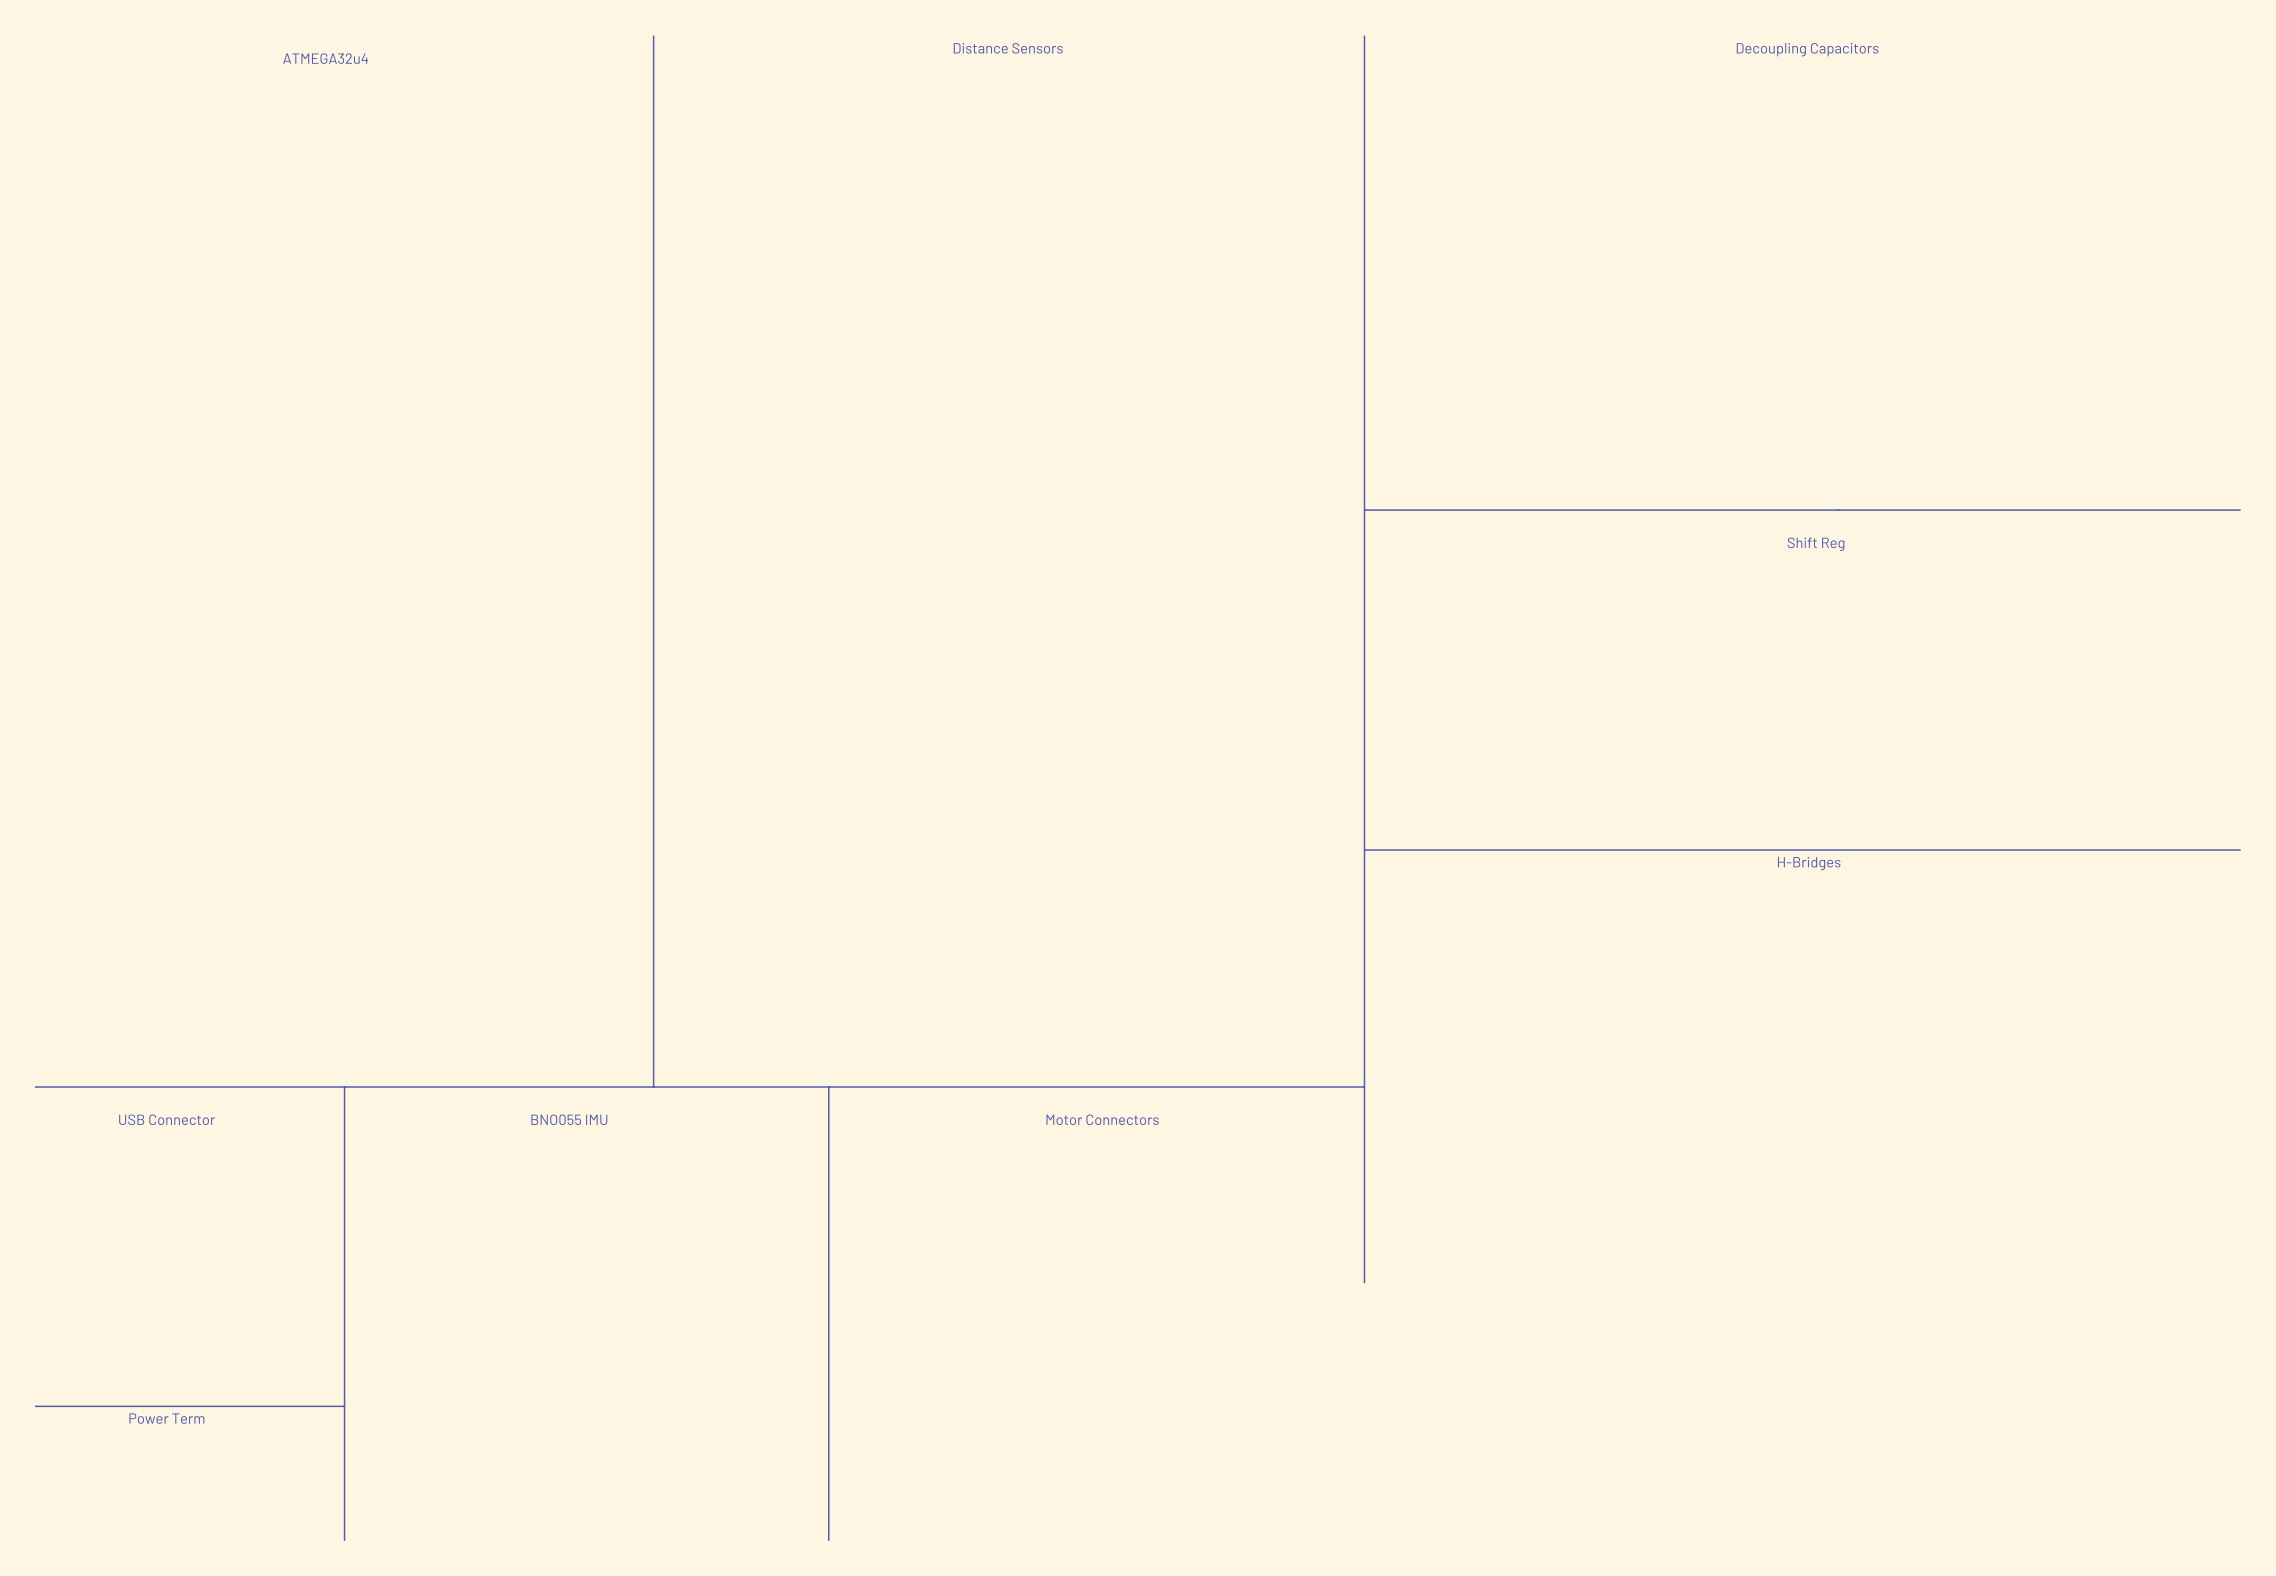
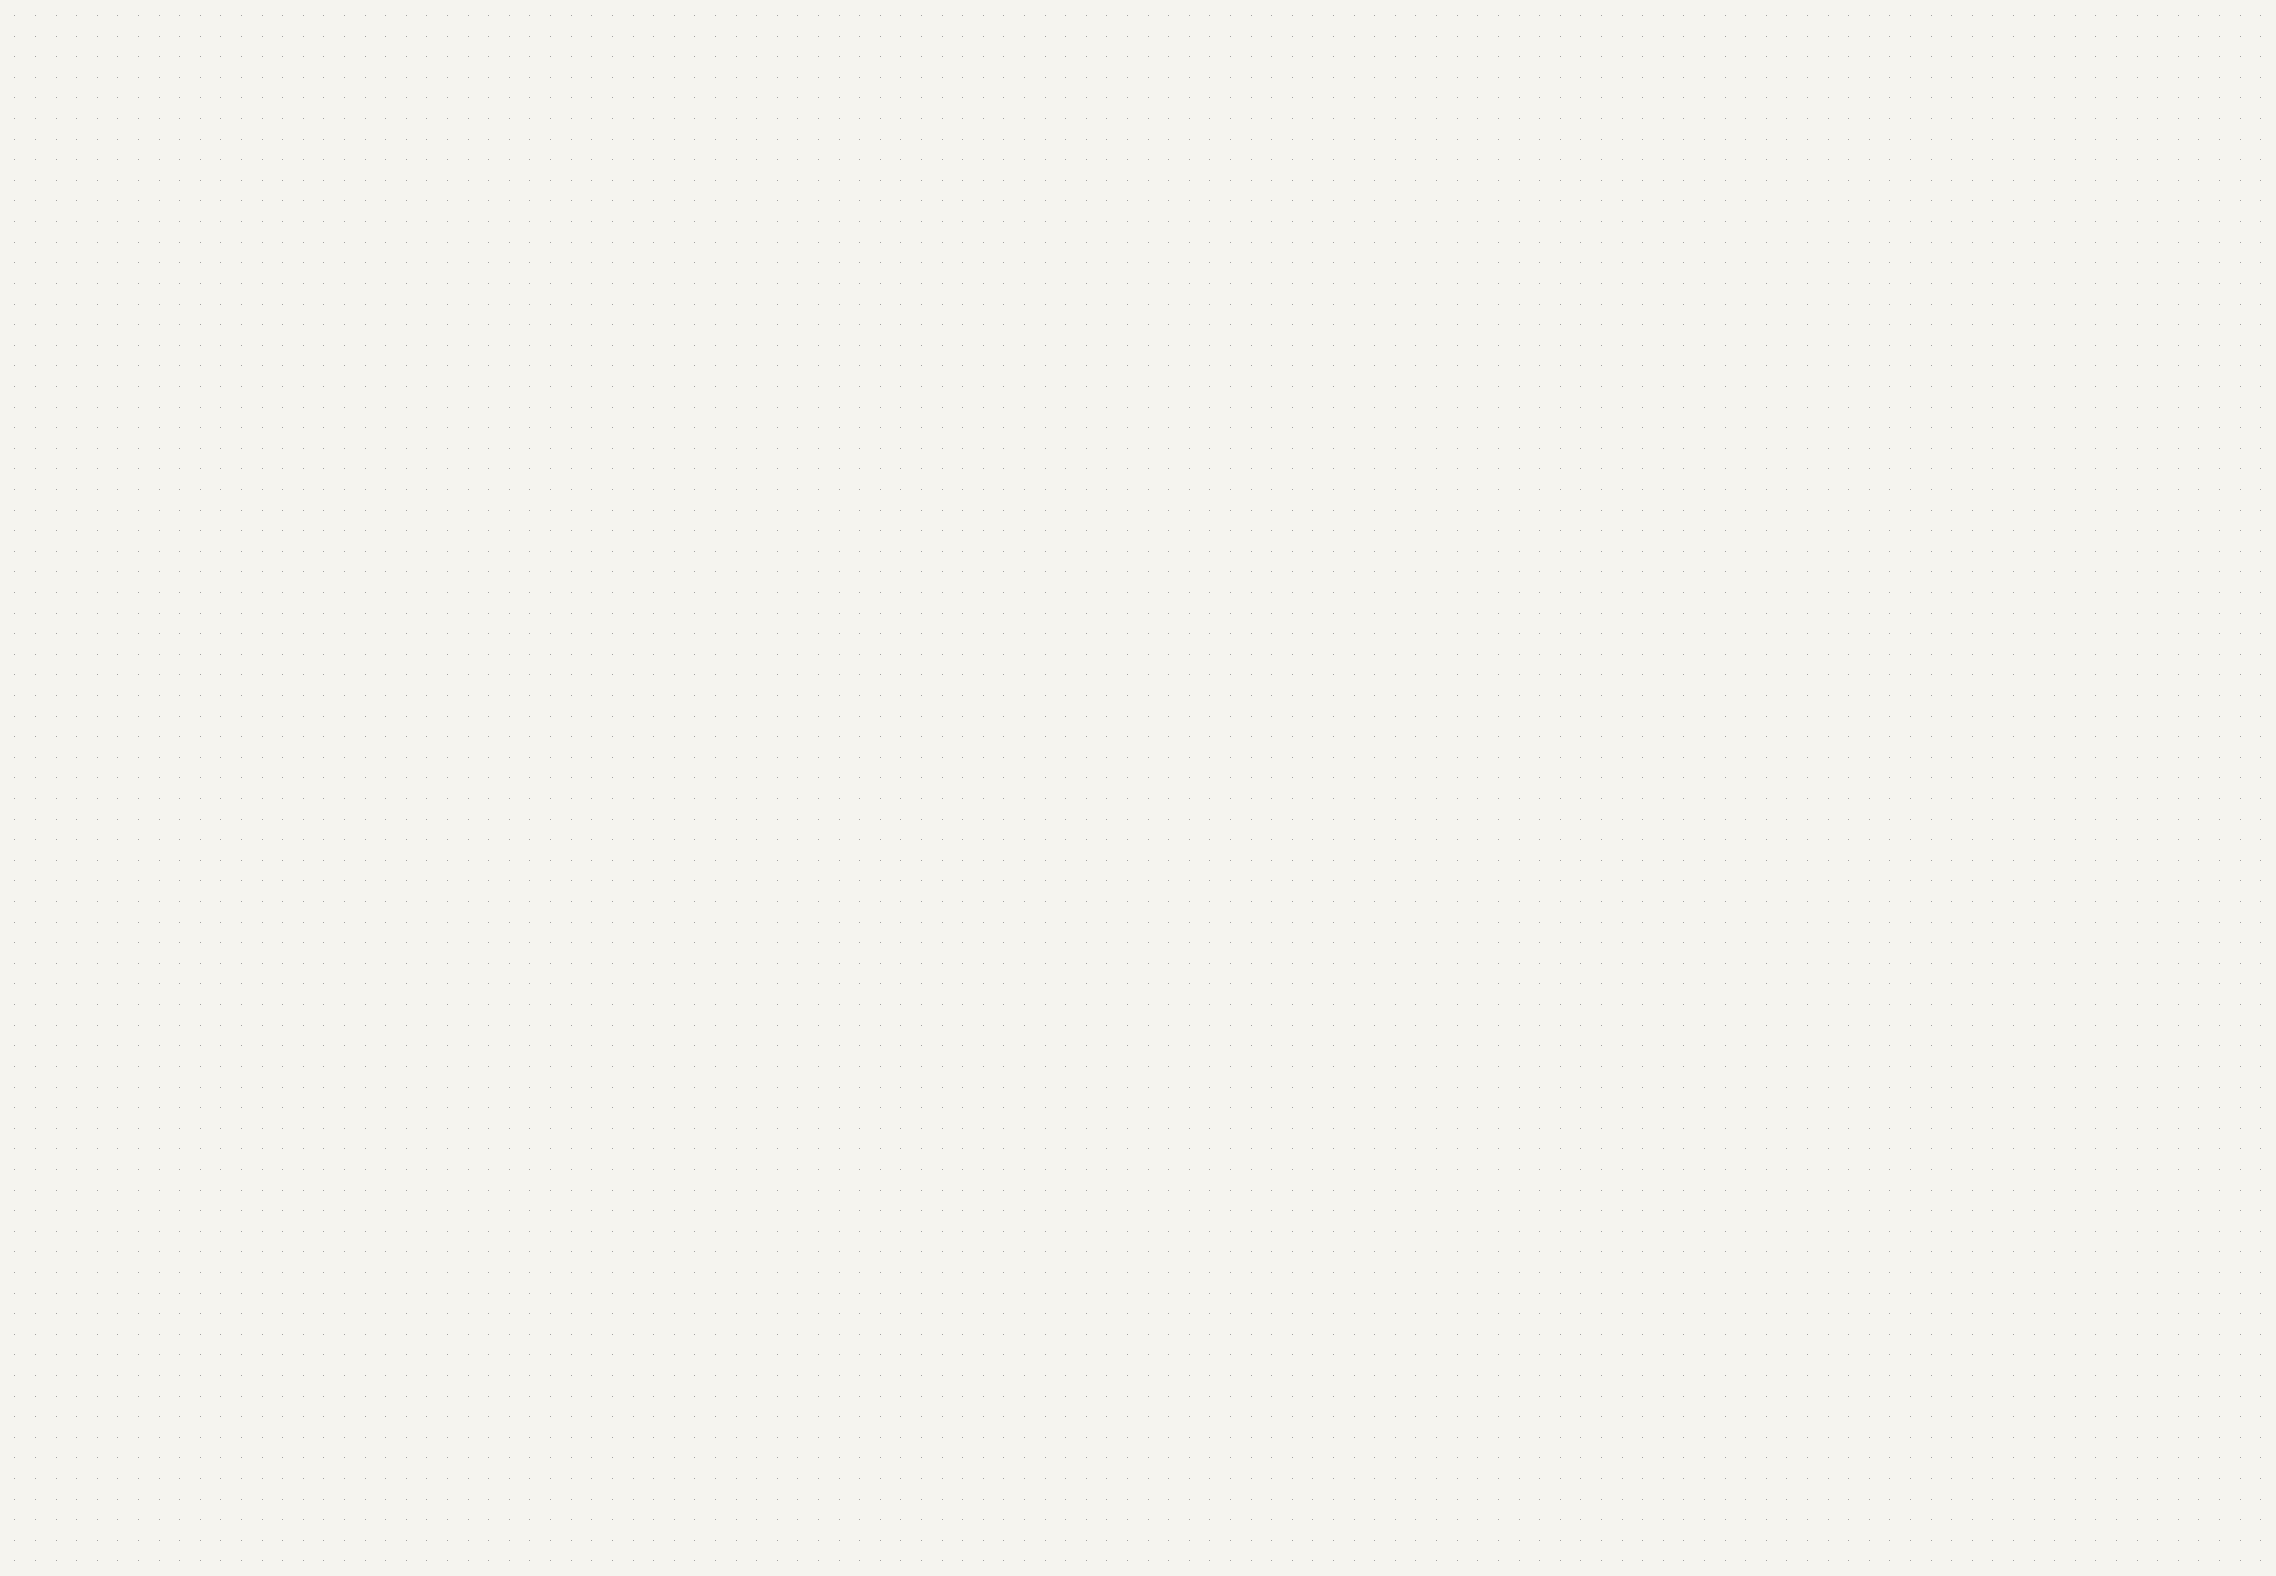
line: (653, 36) (653, 1087) -> none
line: (1364, 36) (1364, 1282) -> none
text: Distance Sensors (1008, 48) -> none
text: Decoupling Capacitors (1807, 49) -> none
text: ATMEGA32u4 (325, 58) -> none
line: (1364, 510) (2240, 510) -> none
text: Shift Reg (1816, 544) -> none
line: (1364, 850) (2240, 850) -> none
text: H-Bridges (1809, 863) -> none
line: (35, 1087) (1364, 1087) -> none
line: (344, 1087) (344, 1540) -> none
line: (828, 1087) (828, 1540) -> none
text: USB Connector (167, 1119) -> none
text: BNO055 IMU (569, 1119) -> none
text: Motor Connectors (1102, 1119) -> none
line: (35, 1406) (344, 1406) -> none
text: Power Term (166, 1418) -> none

